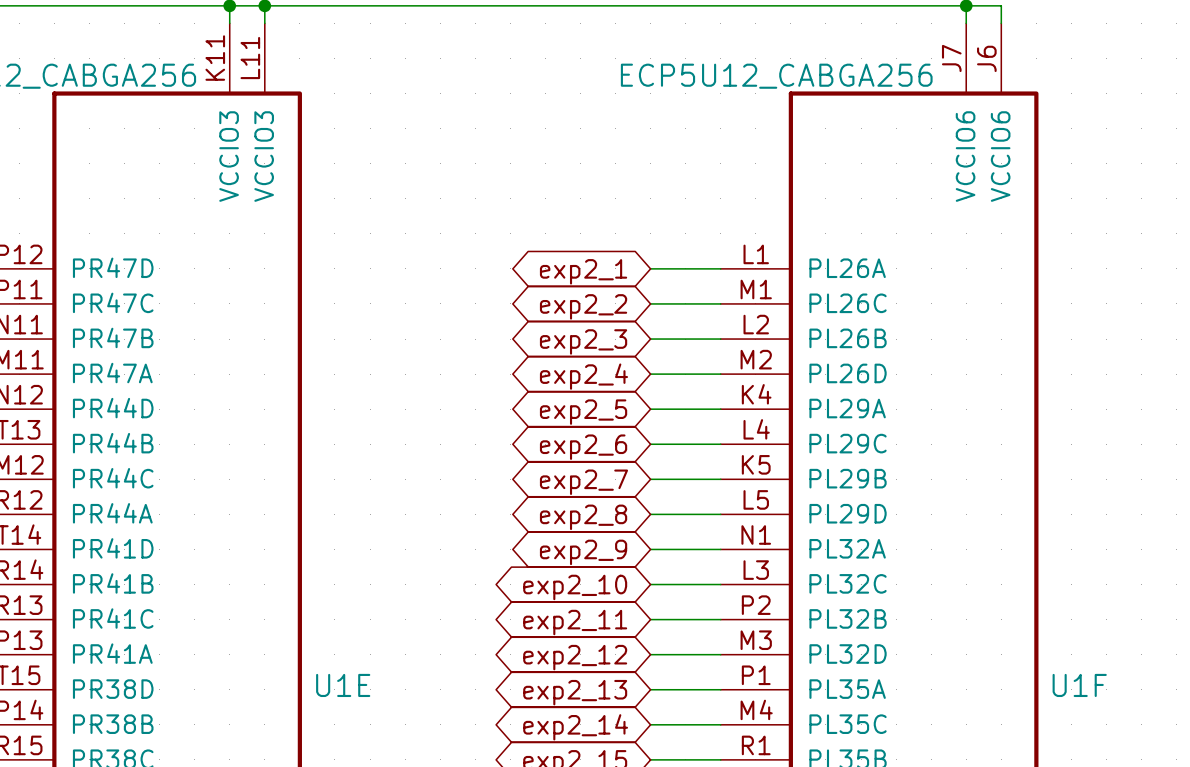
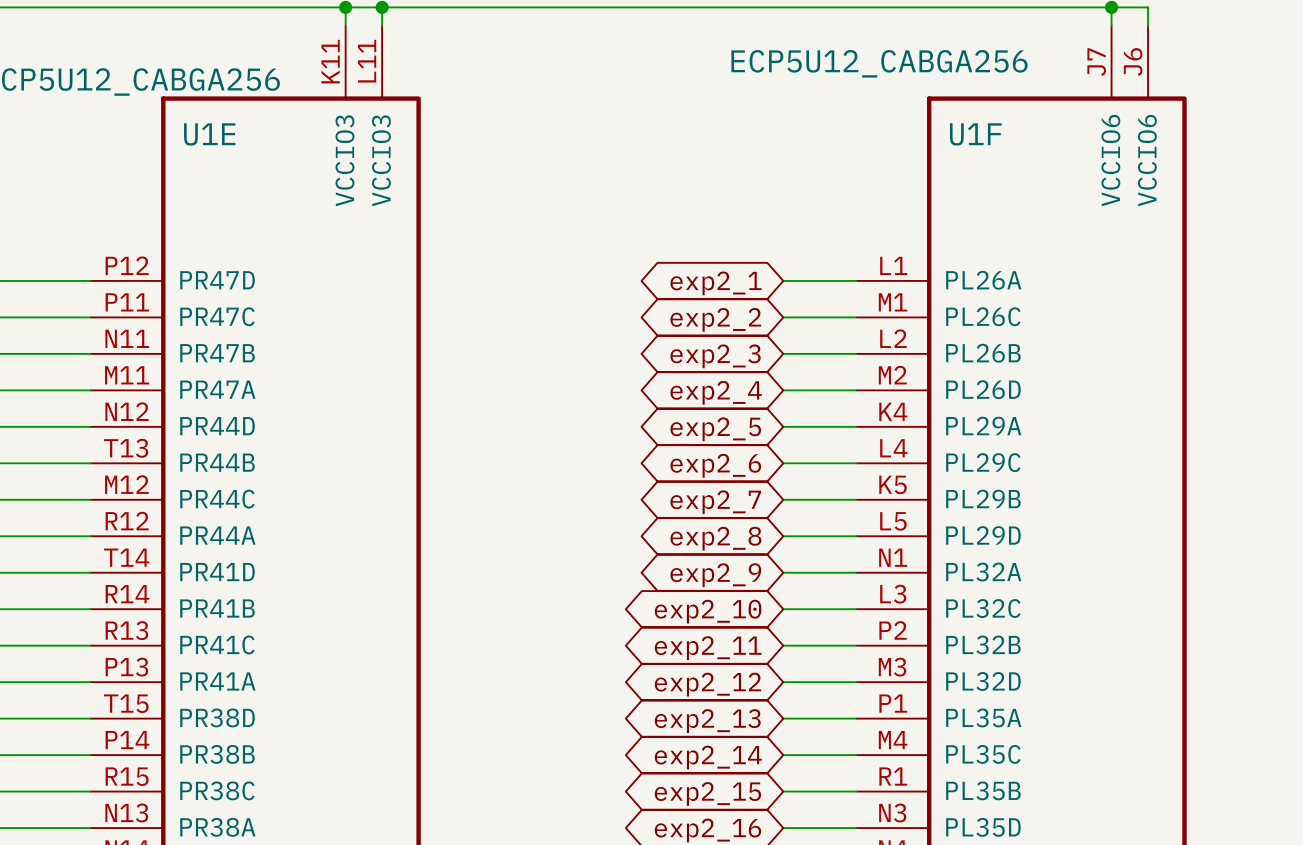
U1F value position: ECP5U12_CABGA256 (776, 76) -> ECP5U12_CABGA256 (879, 63)
U1E name position: U1E (343, 685) -> U1E (209, 134)
U1F name position: U1F (1079, 685) -> U1F (975, 134)

